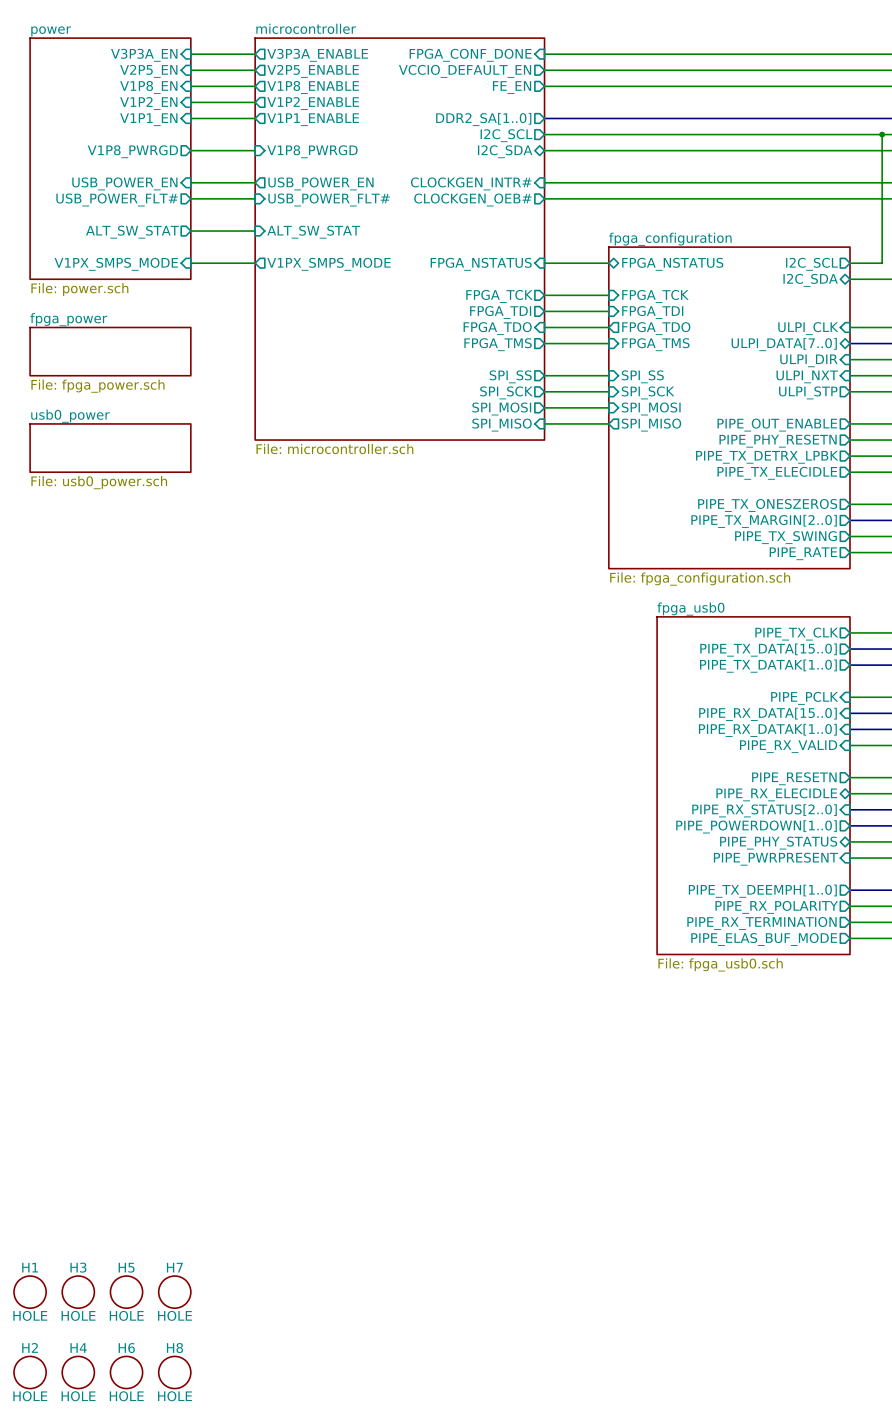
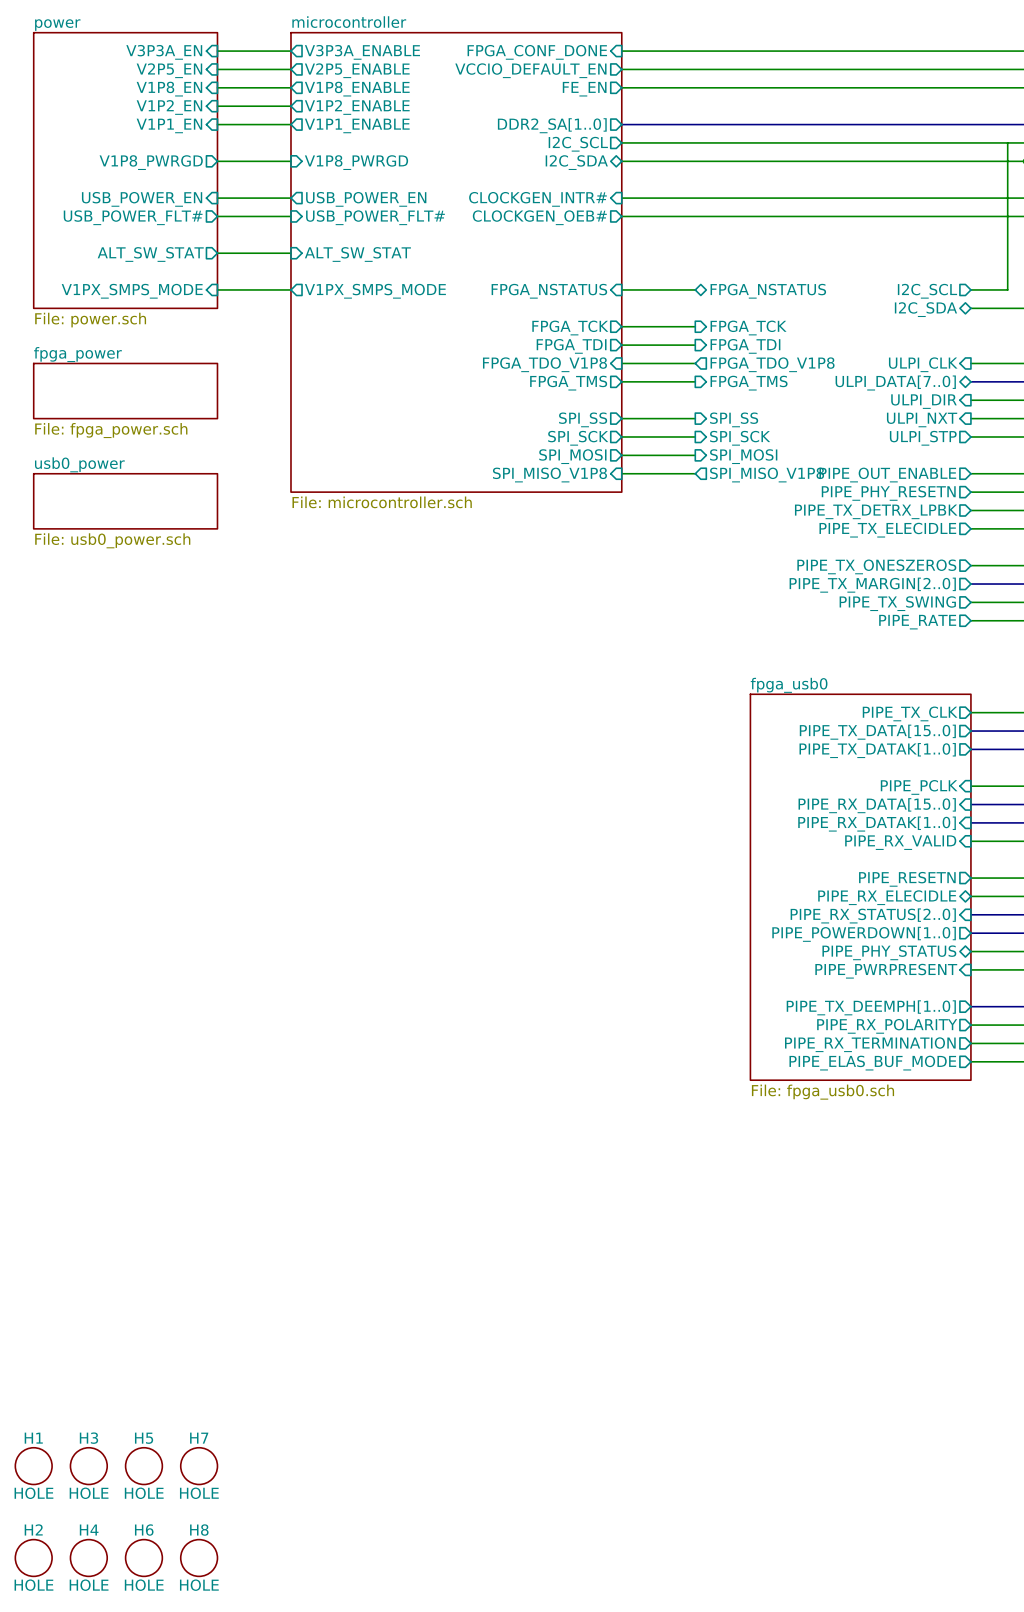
junction: (882, 134) -> none
sheet pin: FPGA_TDO (497, 328) -> FPGA_TDO_V1P8 (544, 364)
sheet pin: FPGA_TDO (656, 328) -> FPGA_TDO_V1P8 (772, 364)
sheet fpga_configuration: File: fpga_configuration.sch (729, 407) -> none
sheet pin: SPI_MISO (502, 425) -> SPI_MISO_V1P8 (549, 475)
sheet pin: SPI_MISO (651, 425) -> SPI_MISO_V1P8 (767, 475)

